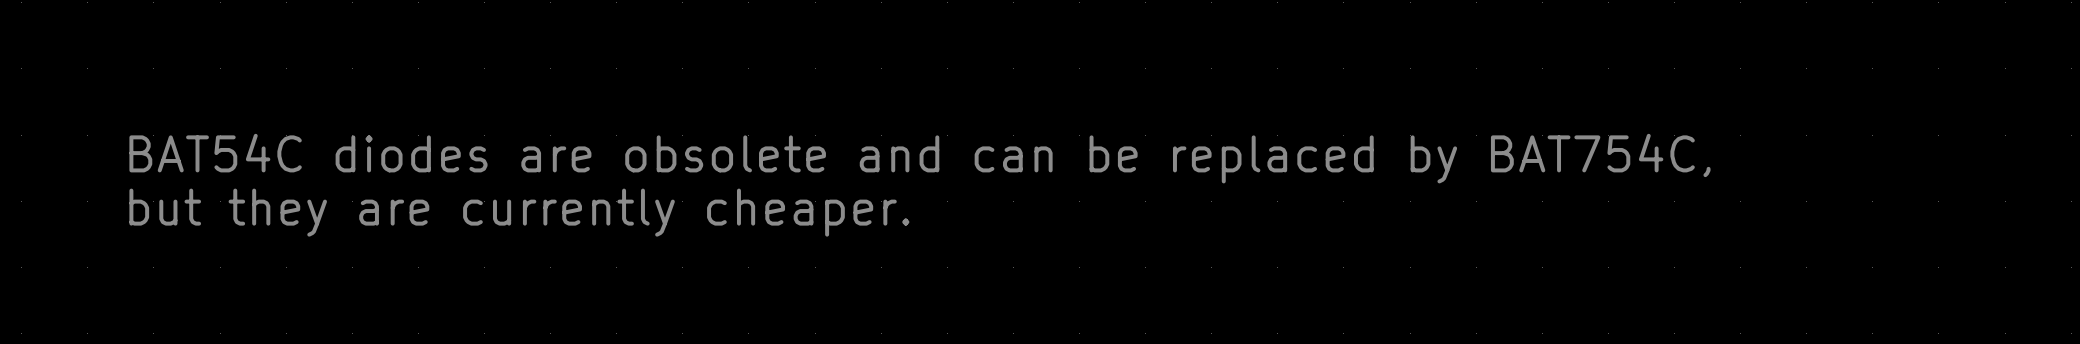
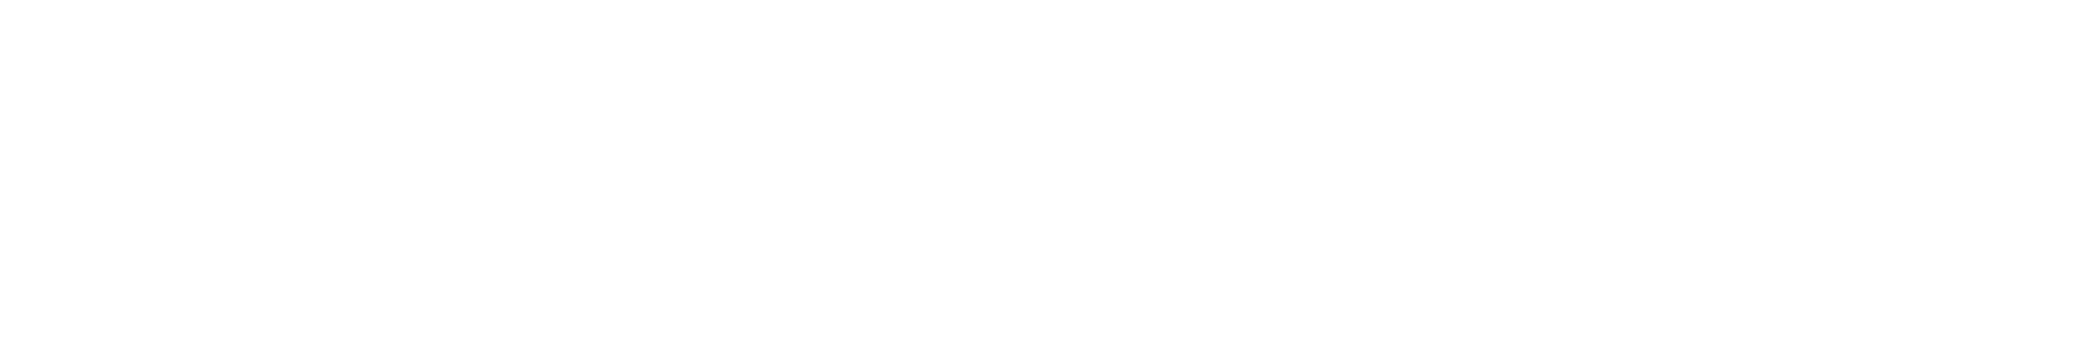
text: BAT54C diodes are obsolete and can be replaced by BAT754C, (919, 158) -> none
text: but they are currently cheaper. (519, 212) -> none

